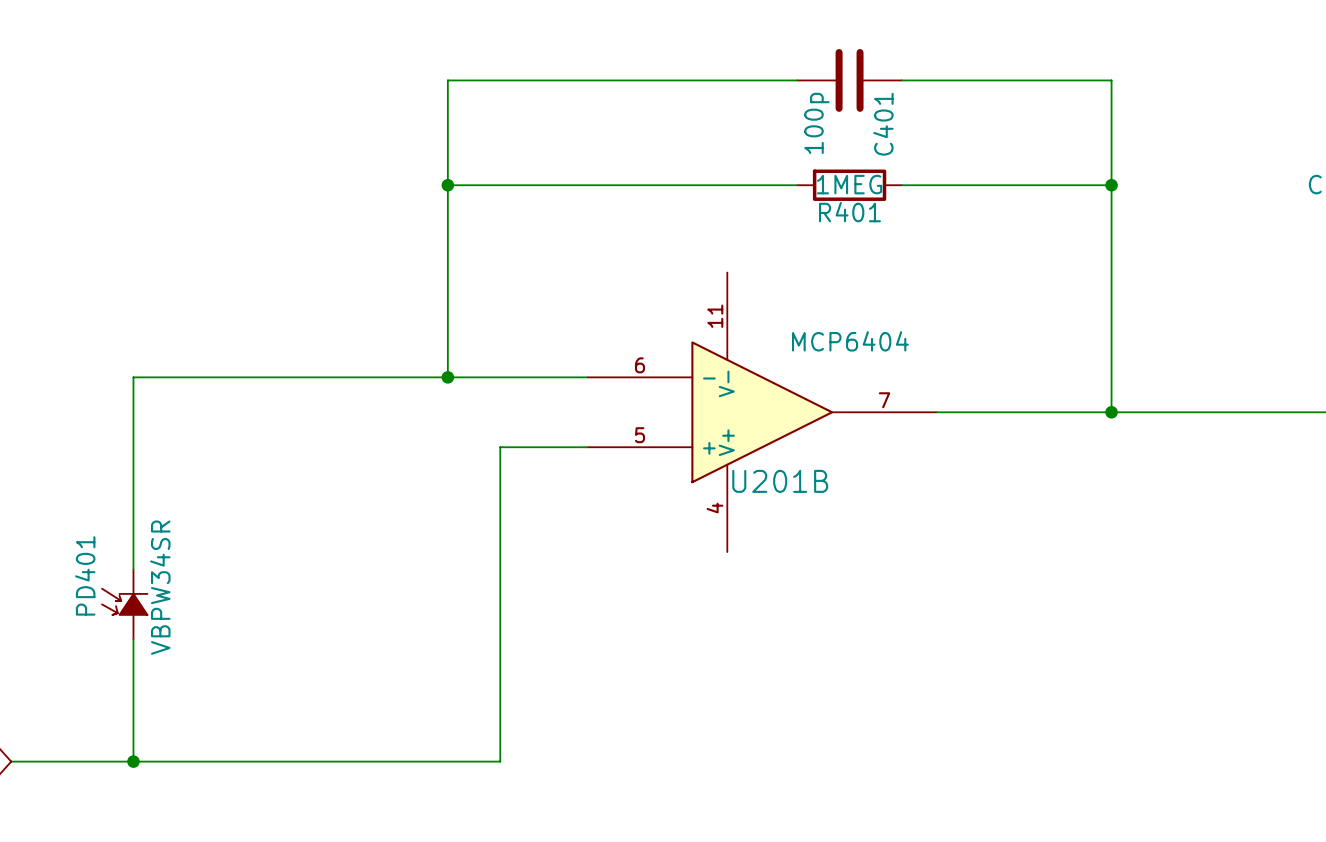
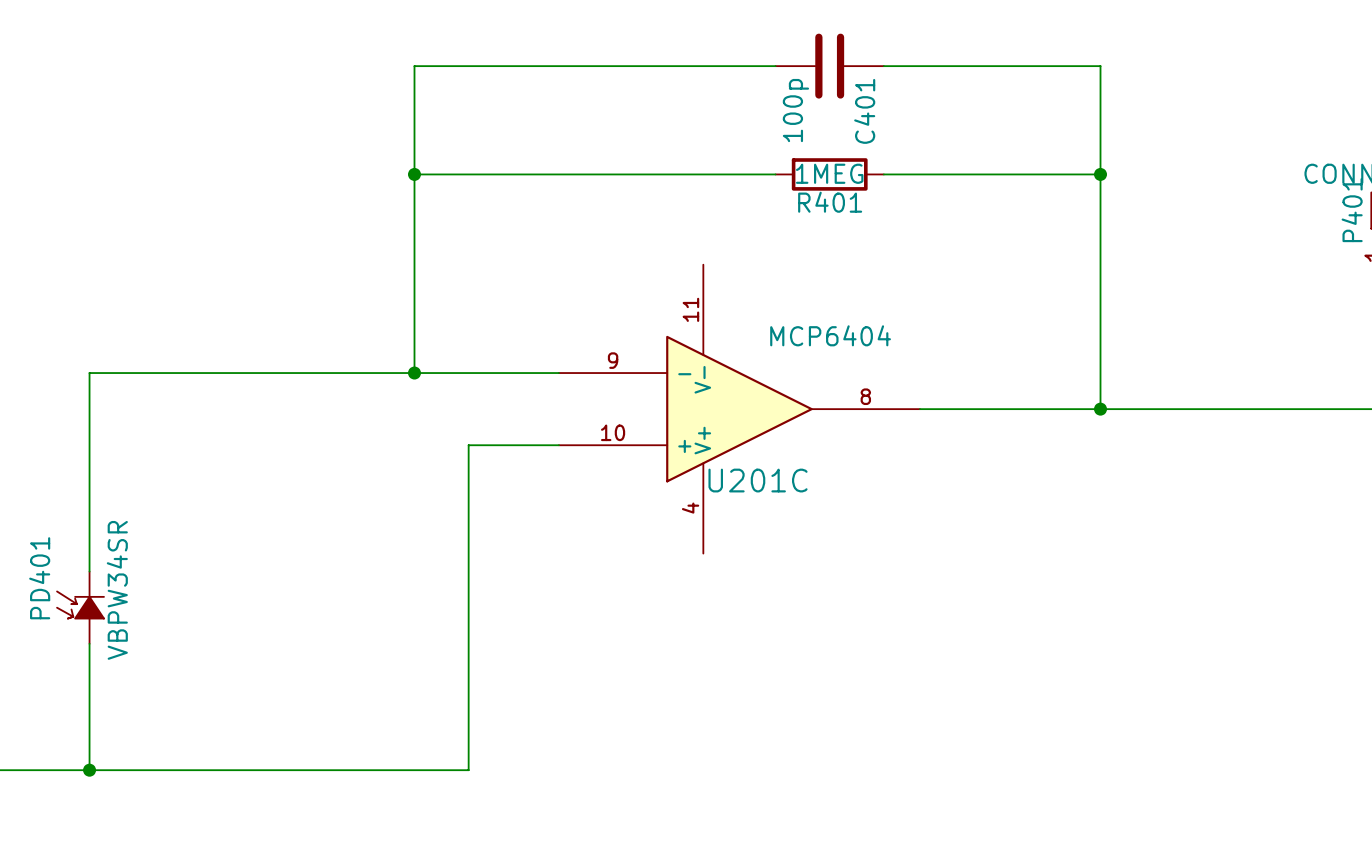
U201B pin number: 6 (639, 365) -> 9 (613, 360)
U201B pin number: 7 (884, 400) -> 8 (865, 396)
U201B pin number: 5 (639, 435) -> 10 (613, 432)
U201B name: U201B (780, 481) -> U201C (758, 480)

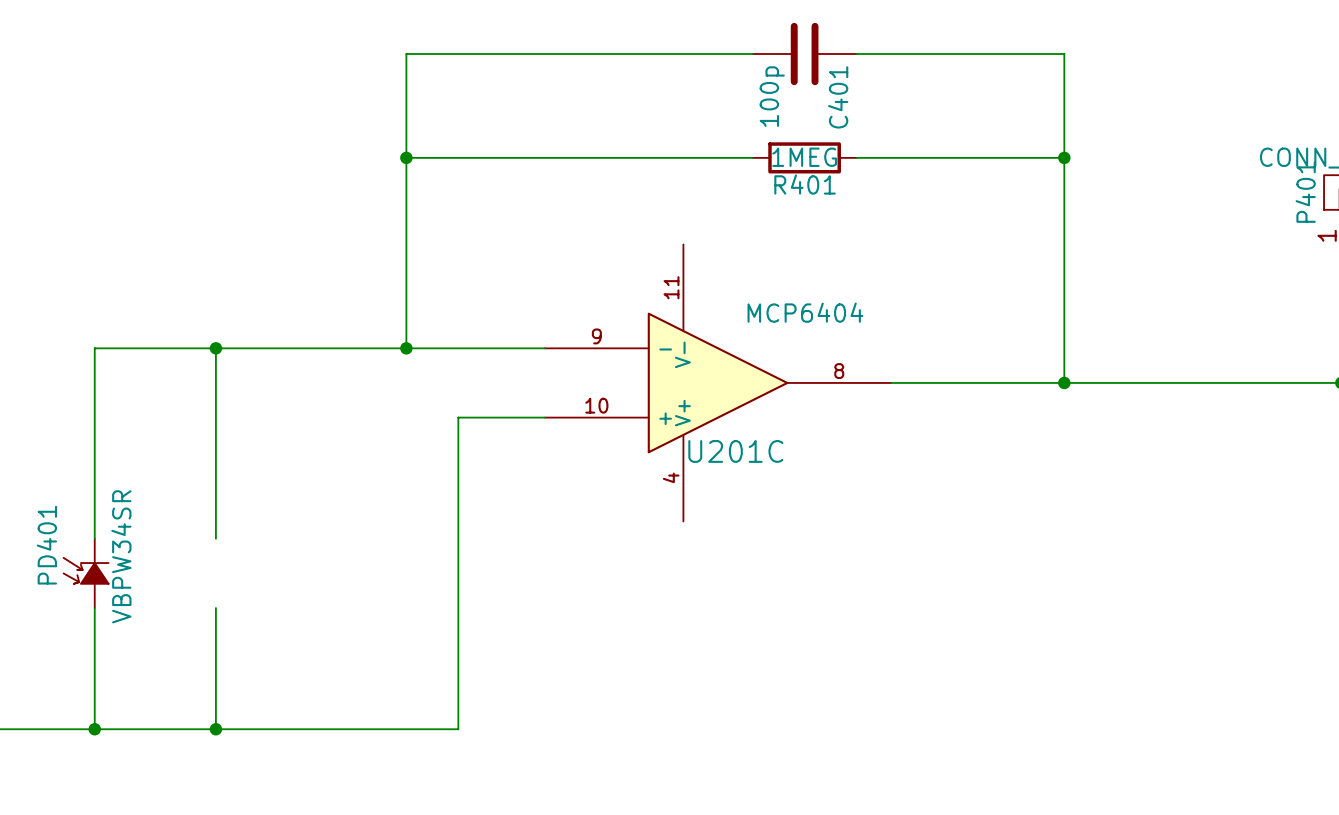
wire: none -> (215, 348) (215, 538)
junction: none -> (215, 348)
wire: none -> (215, 608) (215, 729)
junction: none -> (215, 729)

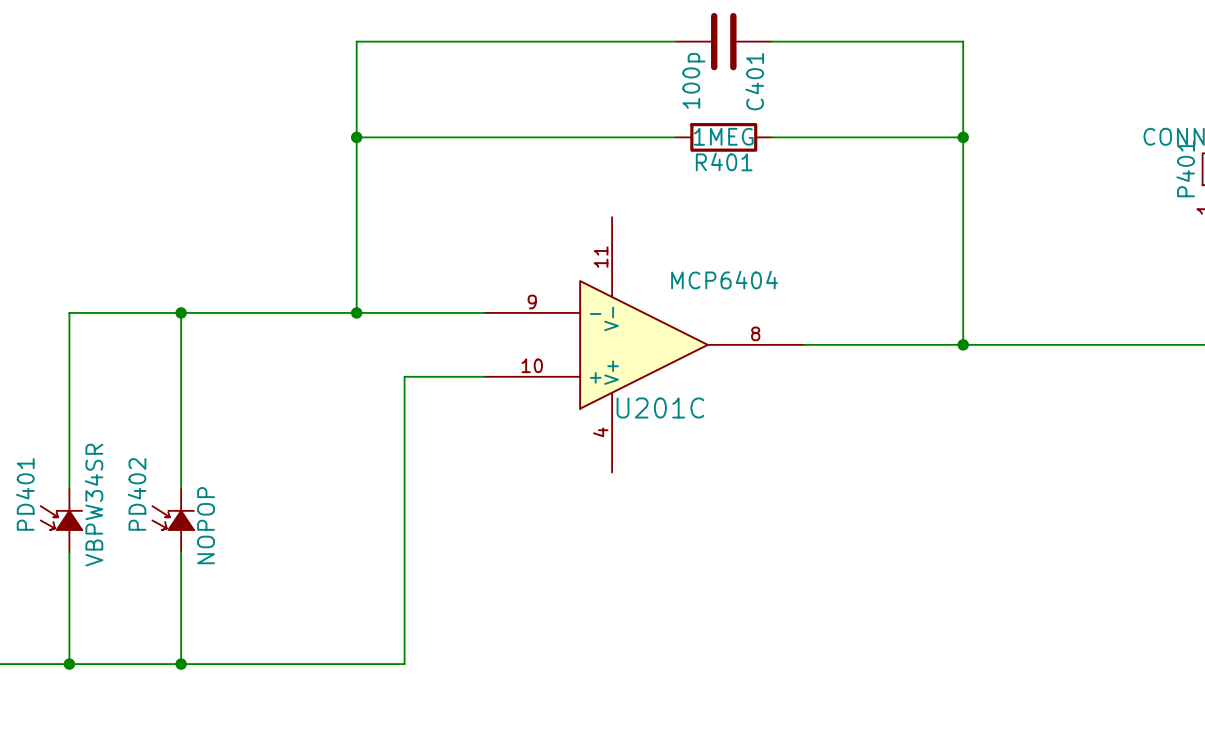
PD402: none -> NOPOP (173, 520)

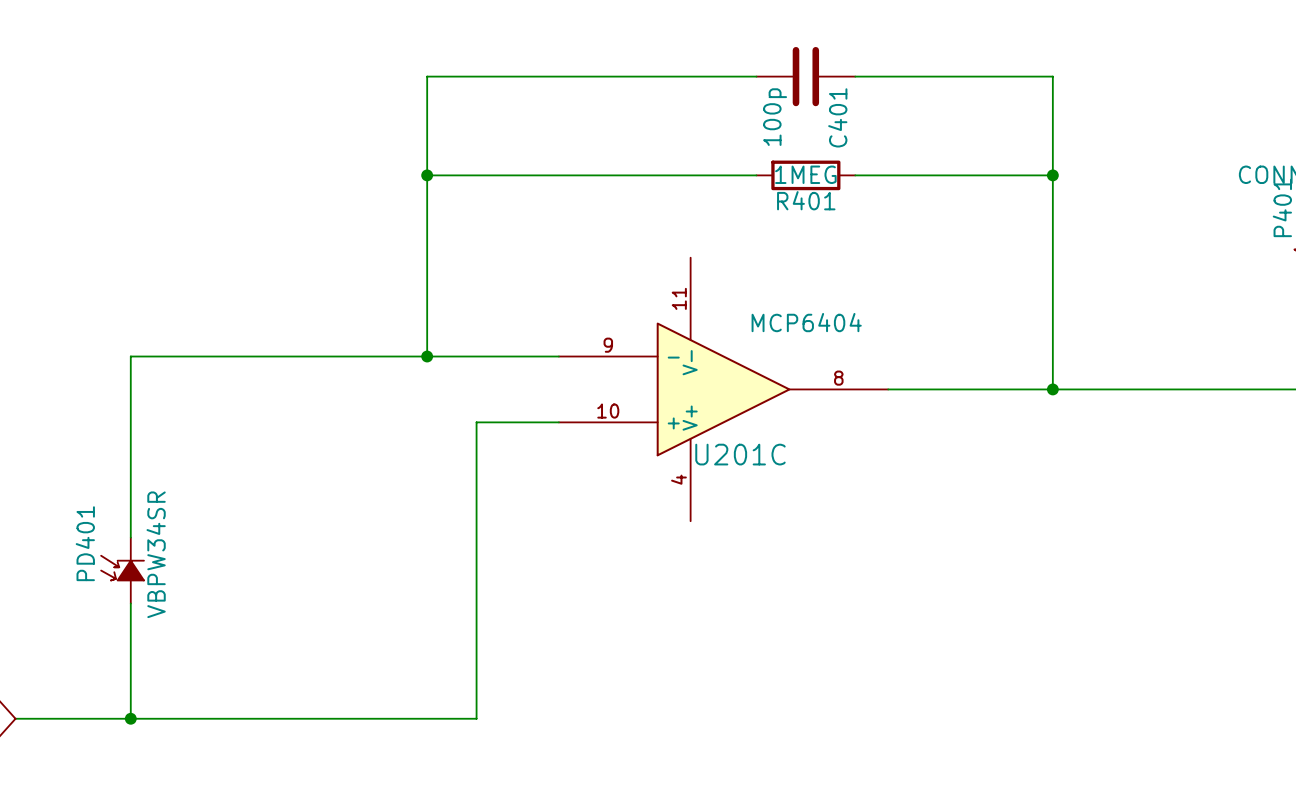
wire: (181, 312) (181, 488) -> none
junction: (181, 312) -> none
PD402: NOPOP (173, 520) -> none
wire: (181, 552) (181, 664) -> none
junction: (181, 664) -> none

